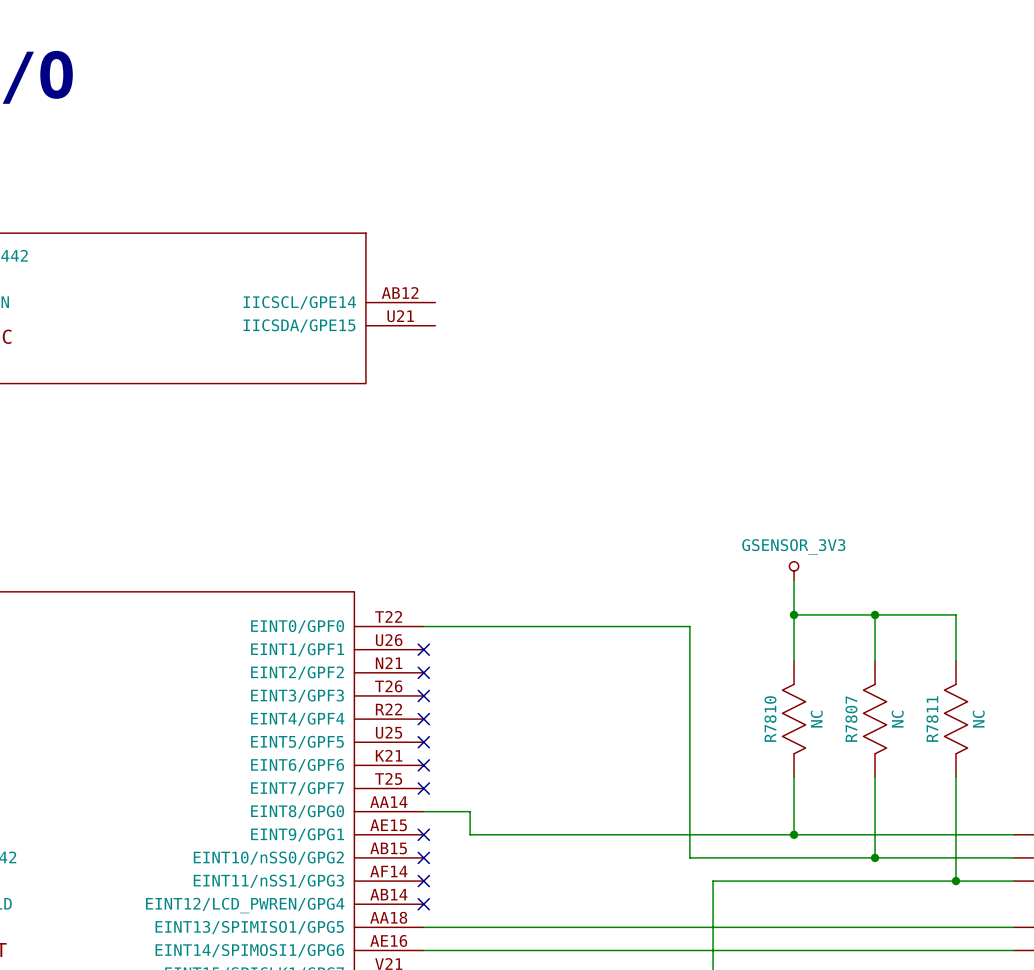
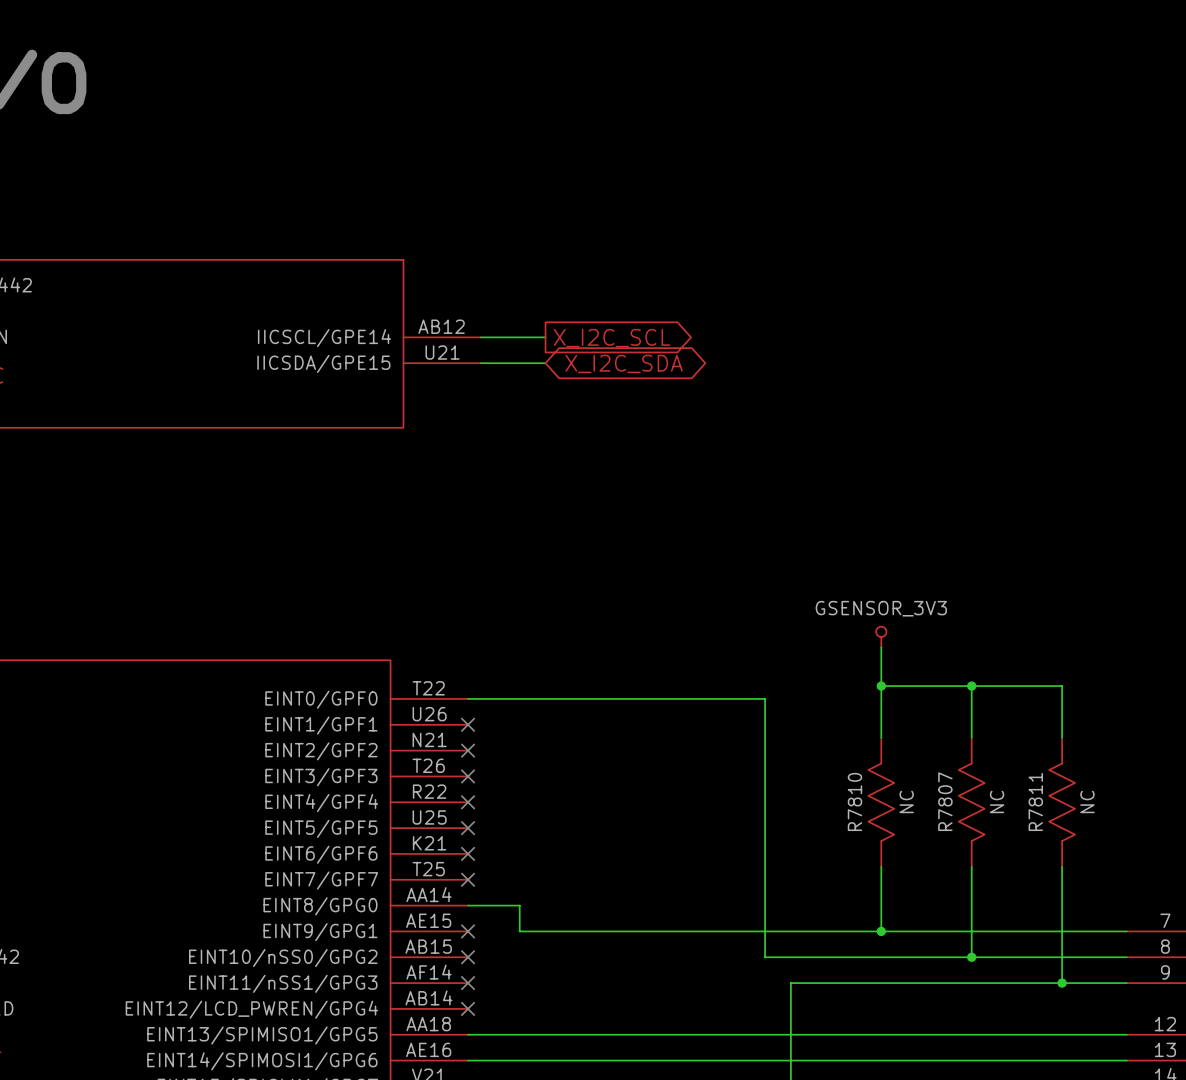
wire: none -> (480, 337) (545, 337)
global label: none -> X_I2C_SCL (612, 338)
wire: none -> (480, 363) (545, 363)
global label: none -> X_I2C_SDA (624, 363)

